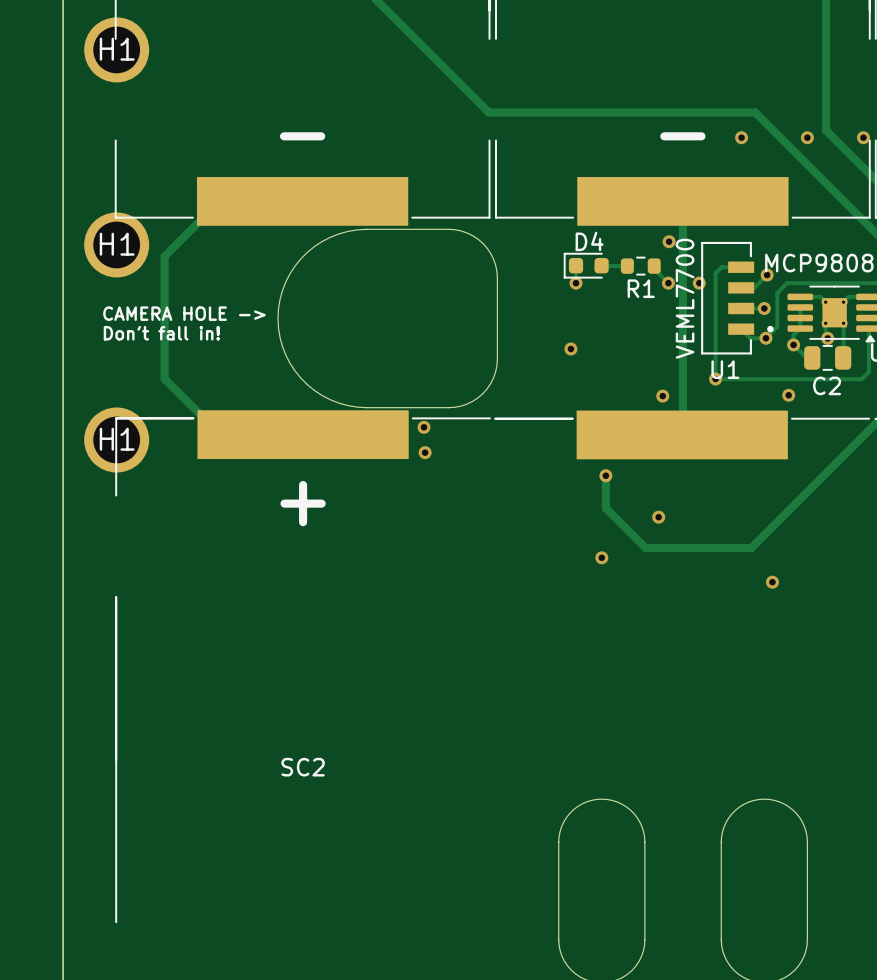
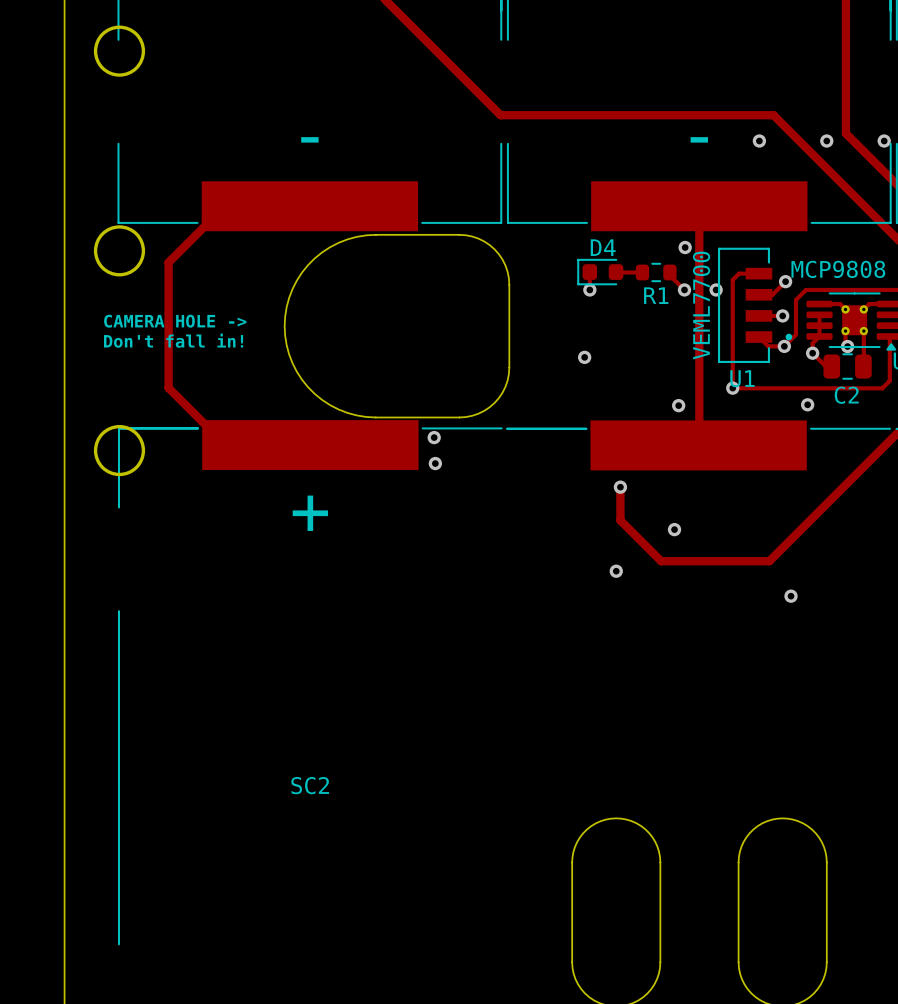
round board edge: none -> [93, 25, 146, 77]
H1: (116, 49) -> none
round board edge: none -> [93, 225, 146, 277]
H1: (116, 244) -> none
round board edge: none -> [93, 424, 146, 477]
H1: (116, 439) -> none

